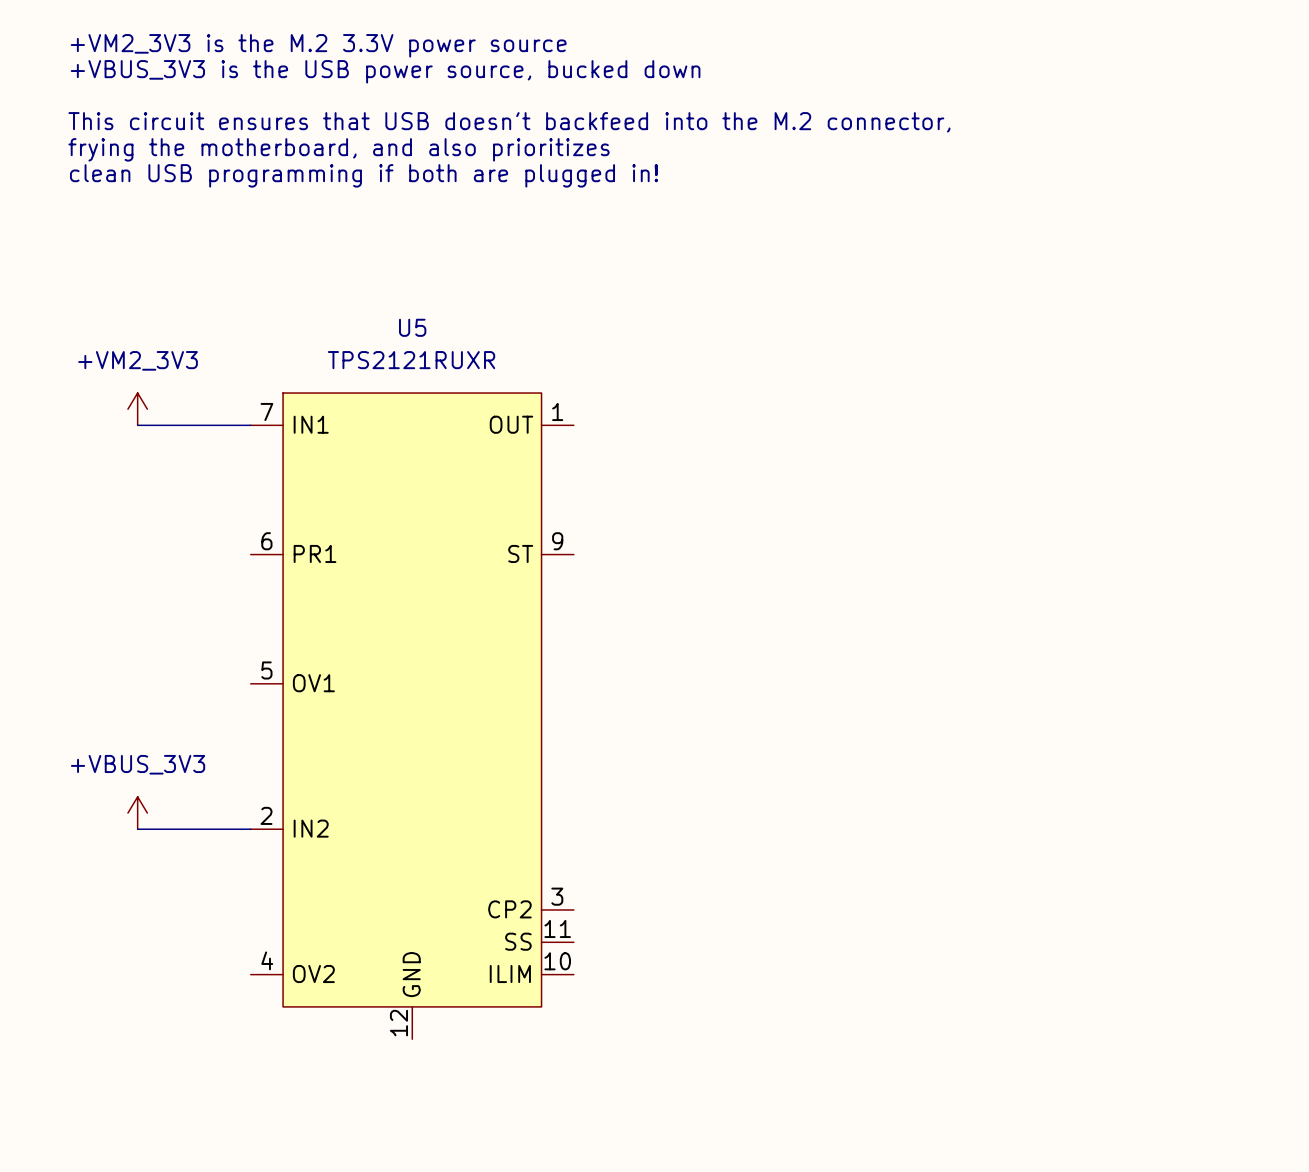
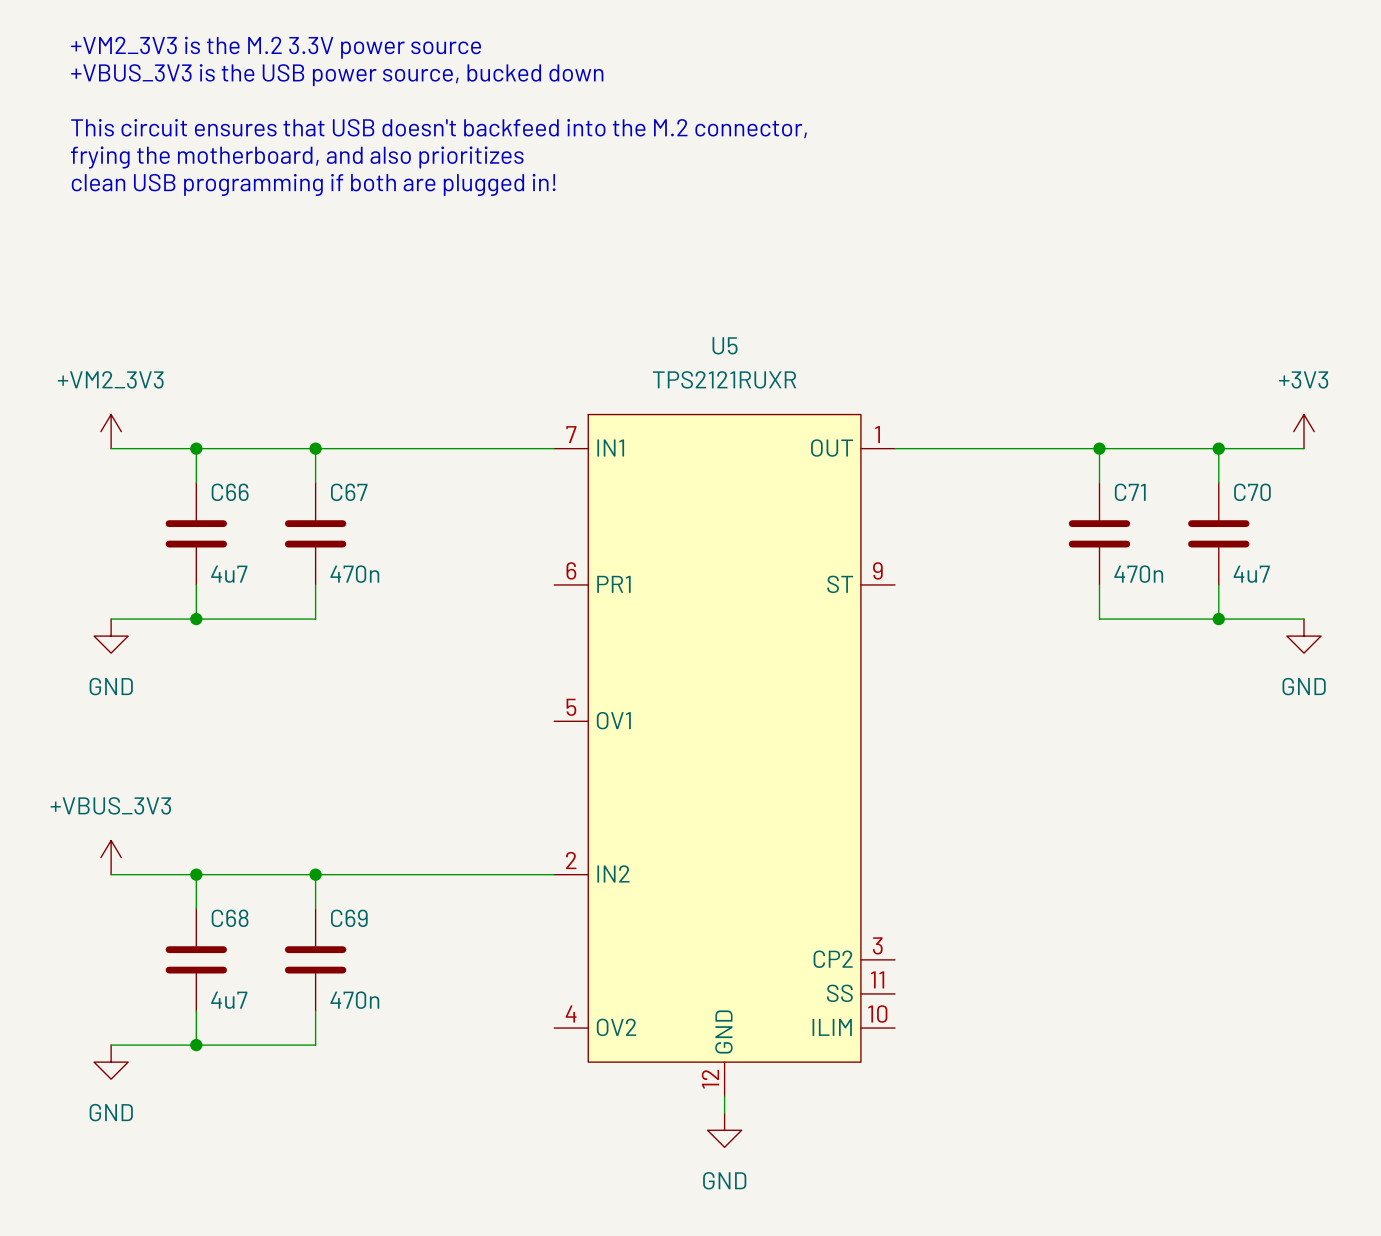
power symbol position: +VM2_3V3 (137, 409) -> +VM2_3V3 (111, 431)
power symbol: none -> +3V3 (1303, 431)
wire: none -> (111, 448) (145, 448)
wire: none -> (196, 448) (196, 482)
junction: none -> (196, 448)
junction: none -> (315, 448)
wire: none -> (895, 448) (1303, 448)
wire: none -> (1099, 448) (1099, 482)
junction: none -> (1099, 448)
wire: none -> (1218, 448) (1218, 482)
junction: none -> (1218, 448)
C66: none -> 4u7 (196, 533)
C67: none -> 470n (315, 533)
C71: none -> 470n (1099, 533)
C70: none -> 4u7 (1218, 533)
wire: none -> (196, 584) (196, 619)
wire: none -> (315, 584) (315, 619) (111, 619)
wire: none -> (1099, 584) (1099, 619) (1303, 619)
wire: none -> (1218, 584) (1218, 619)
junction: none -> (196, 619)
junction: none -> (1218, 619)
power symbol: none -> GND (111, 636)
power symbol: none -> GND (1303, 636)
U5 position: (412, 716) -> (724, 755)
power symbol position: +VBUS_3V3 (137, 813) -> +VBUS_3V3 (111, 857)
wire: none -> (111, 874) (145, 874)
wire: none -> (196, 874) (196, 908)
junction: none -> (196, 874)
junction: none -> (315, 874)
C68: none -> 4u7 (196, 959)
C69: none -> 470n (315, 959)
wire: none -> (196, 1011) (196, 1045)
wire: none -> (315, 1011) (315, 1045) (111, 1045)
junction: none -> (196, 1045)
power symbol: none -> GND (111, 1062)
wire: none -> (724, 1096) (724, 1113)
power symbol: none -> GND (724, 1130)

